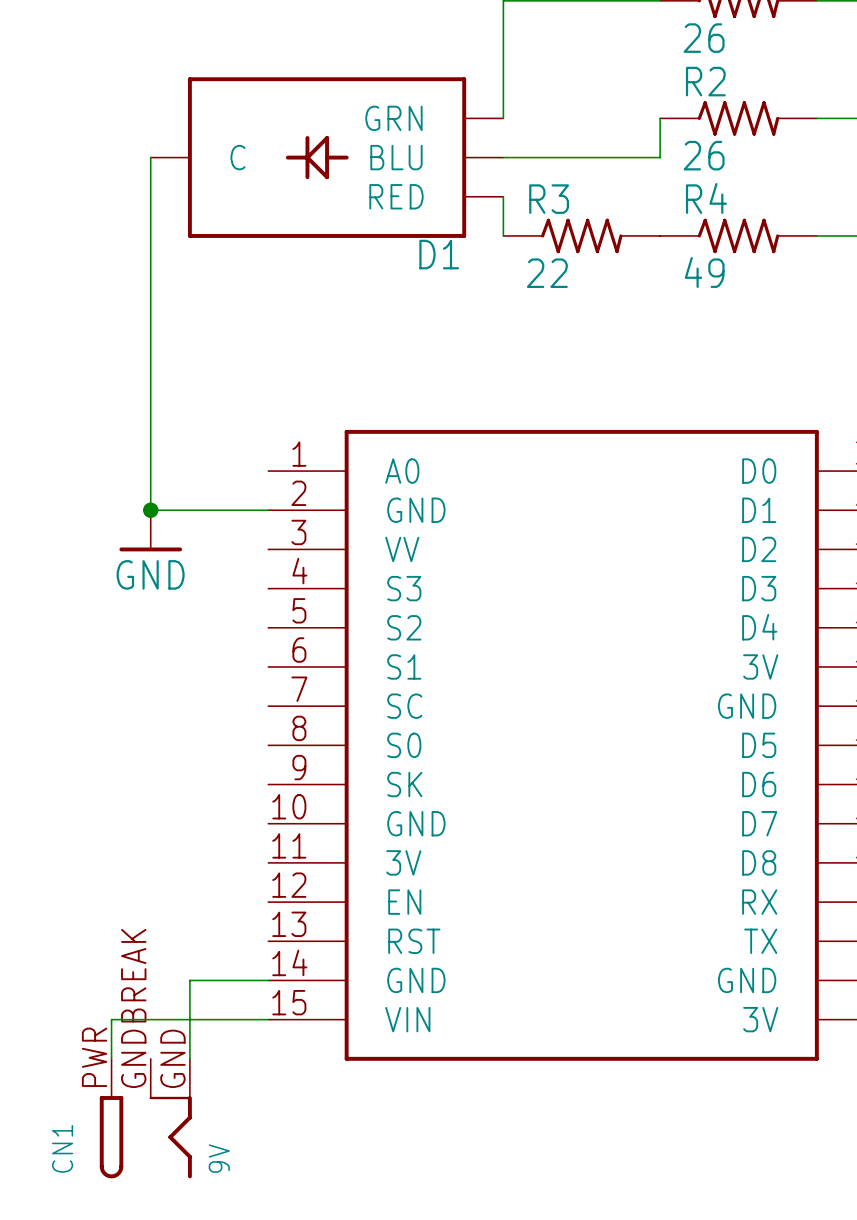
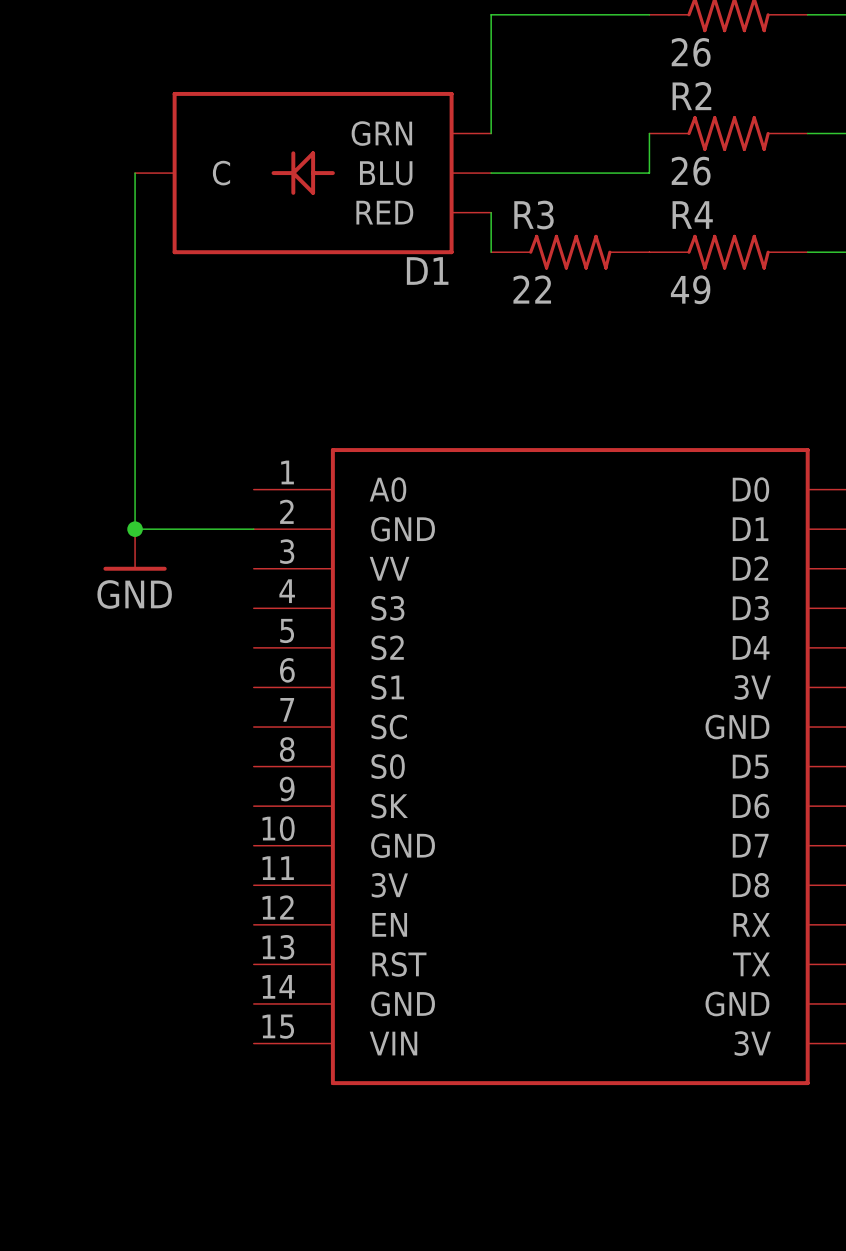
wire: (268, 980) (189, 980) (189, 1058) -> none
wire: (268, 1019) (111, 1019) (111, 1058) -> none
CN1: 9V (145, 1118) -> none

